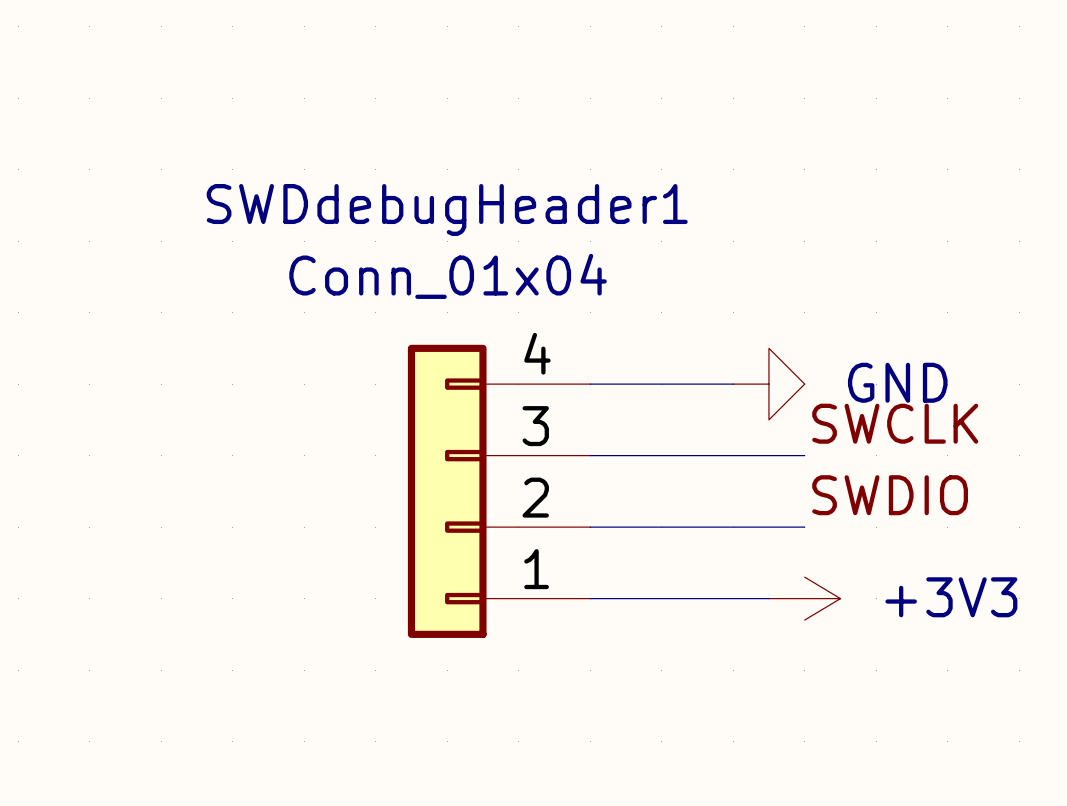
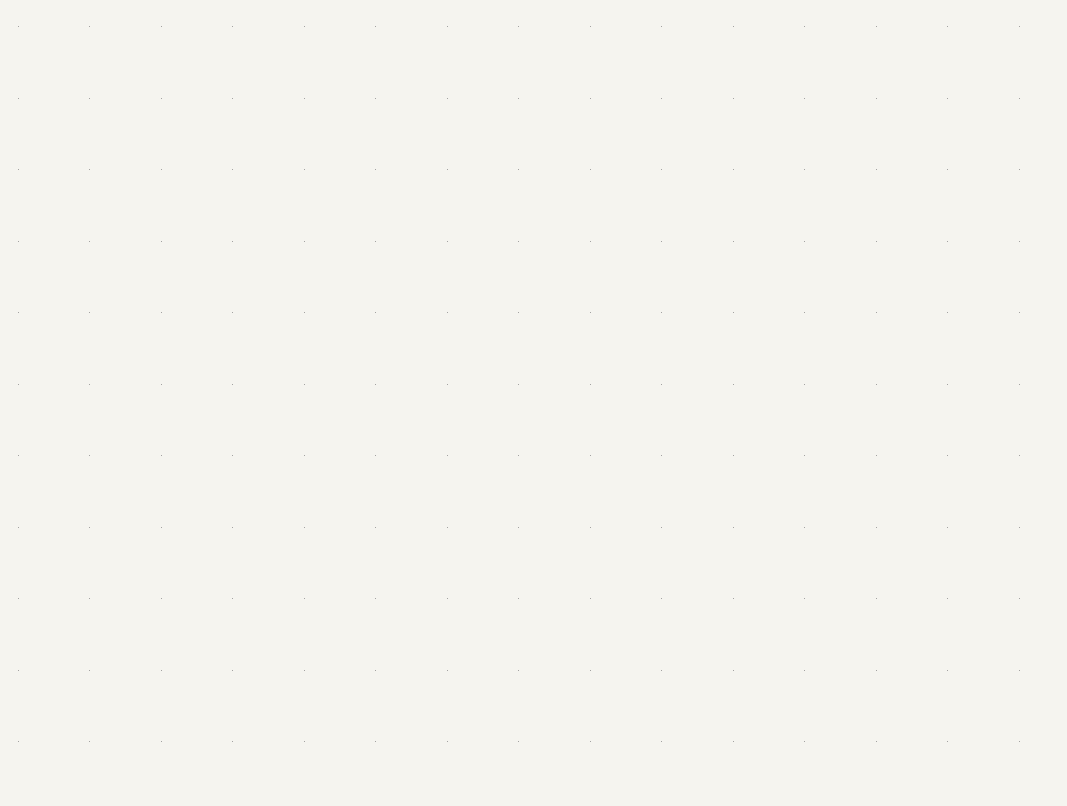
wire: (590, 384) (733, 384) -> none
power symbol: GND (768, 384) -> none
label: SWCLK (895, 423) -> none
wire: (590, 455) (804, 455) -> none
SWDdebugHeader1: Conn_01x04 (499, 491) -> none
label: SWDIO (890, 495) -> none
wire: (590, 527) (804, 527) -> none
wire: (590, 598) (768, 598) -> none
power symbol: +3V3 (804, 598) -> none

